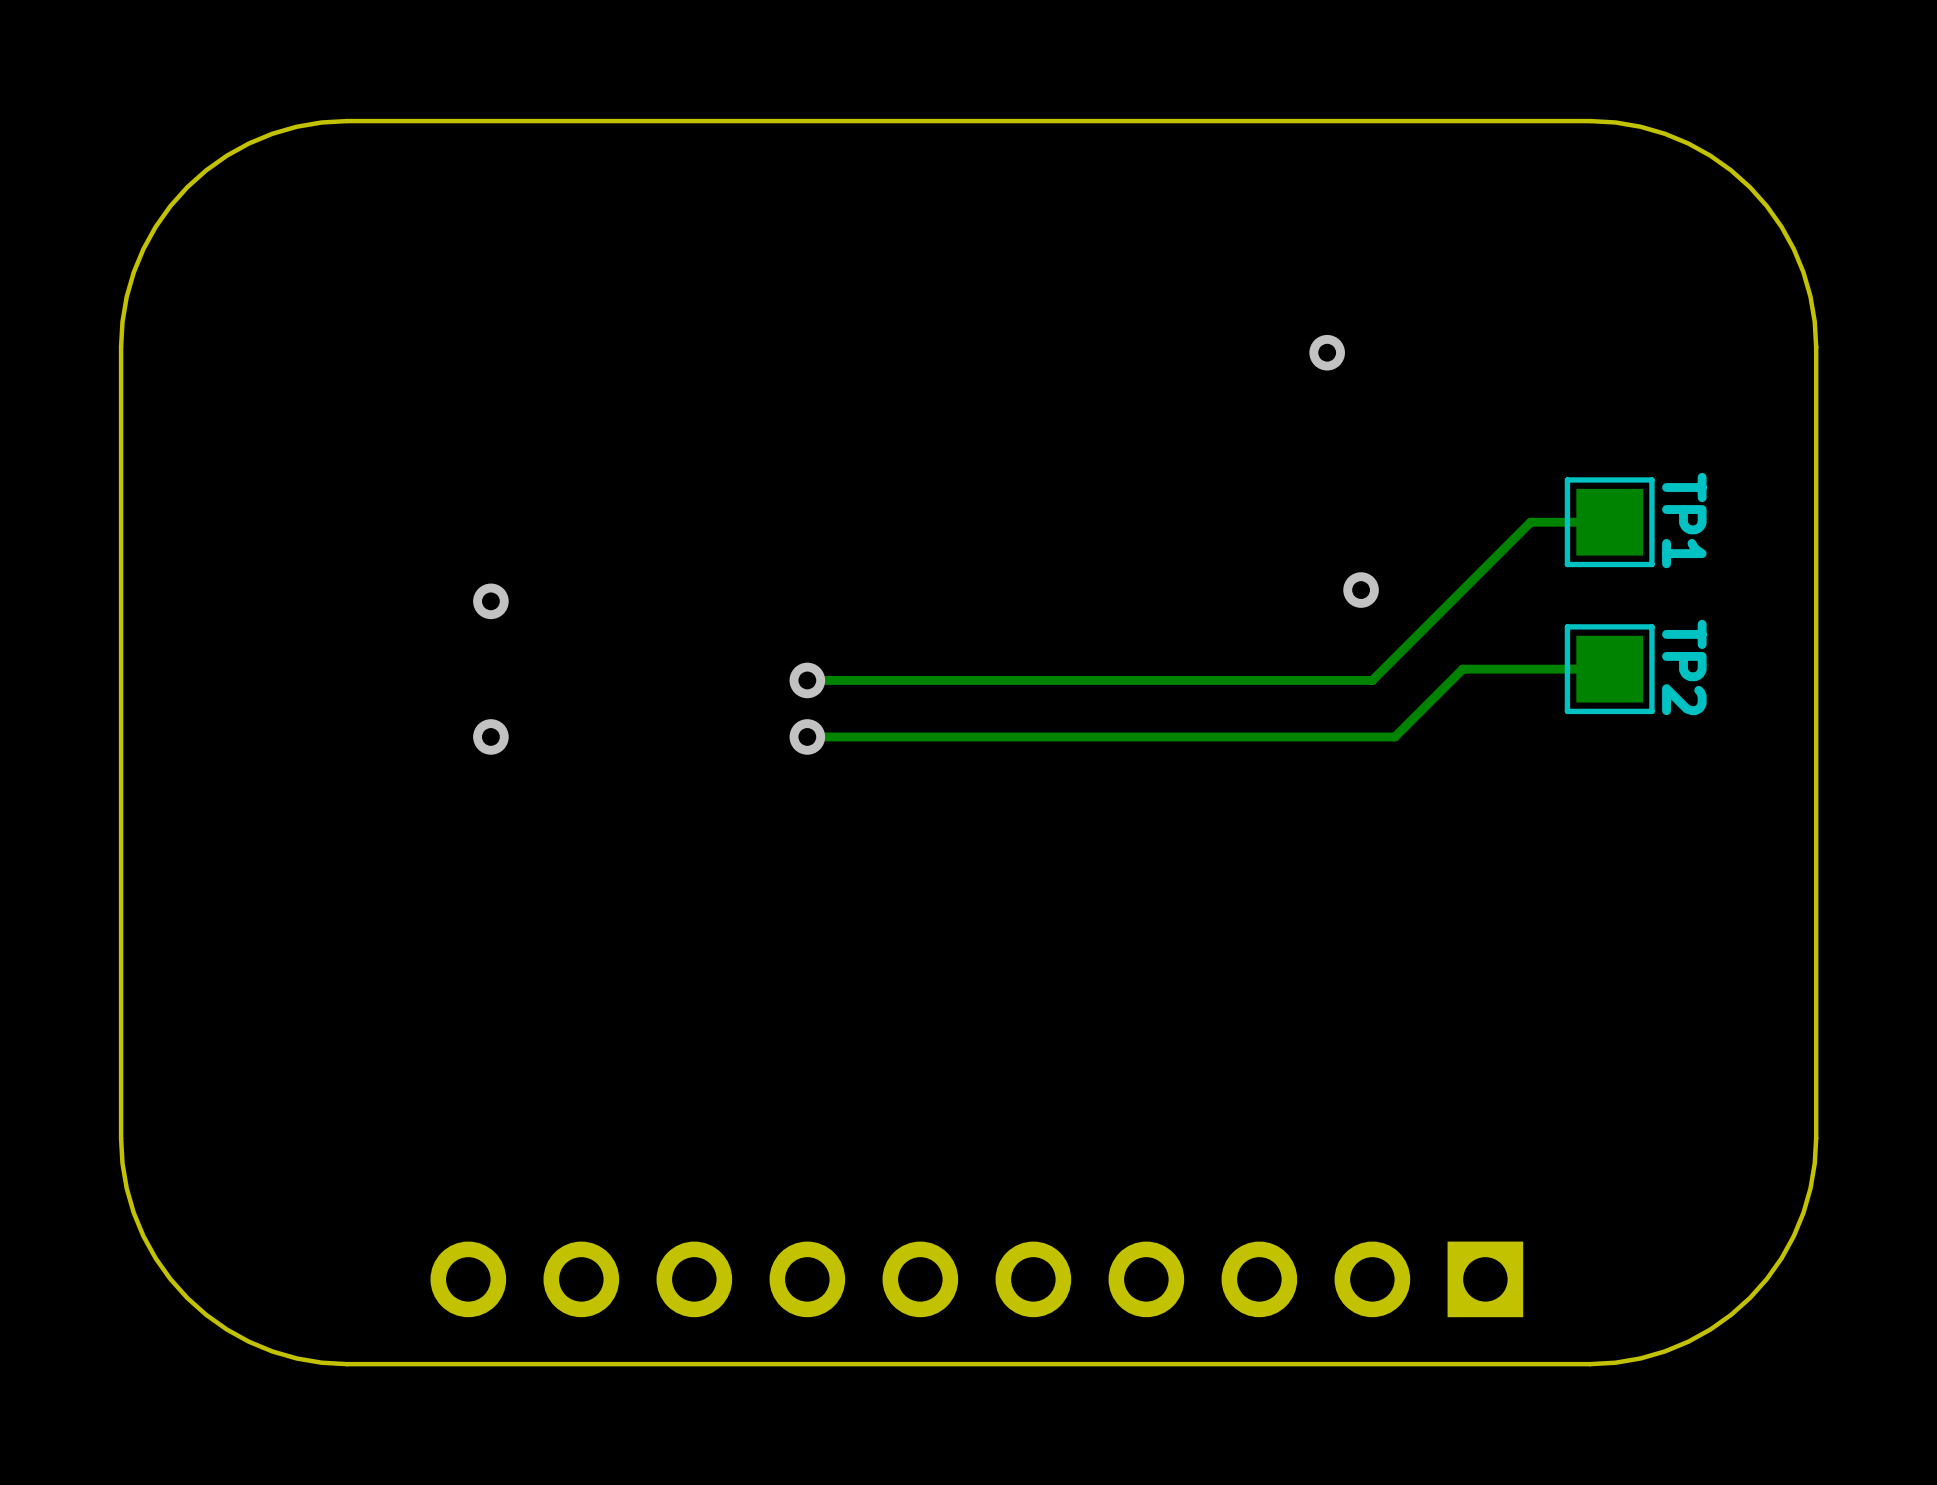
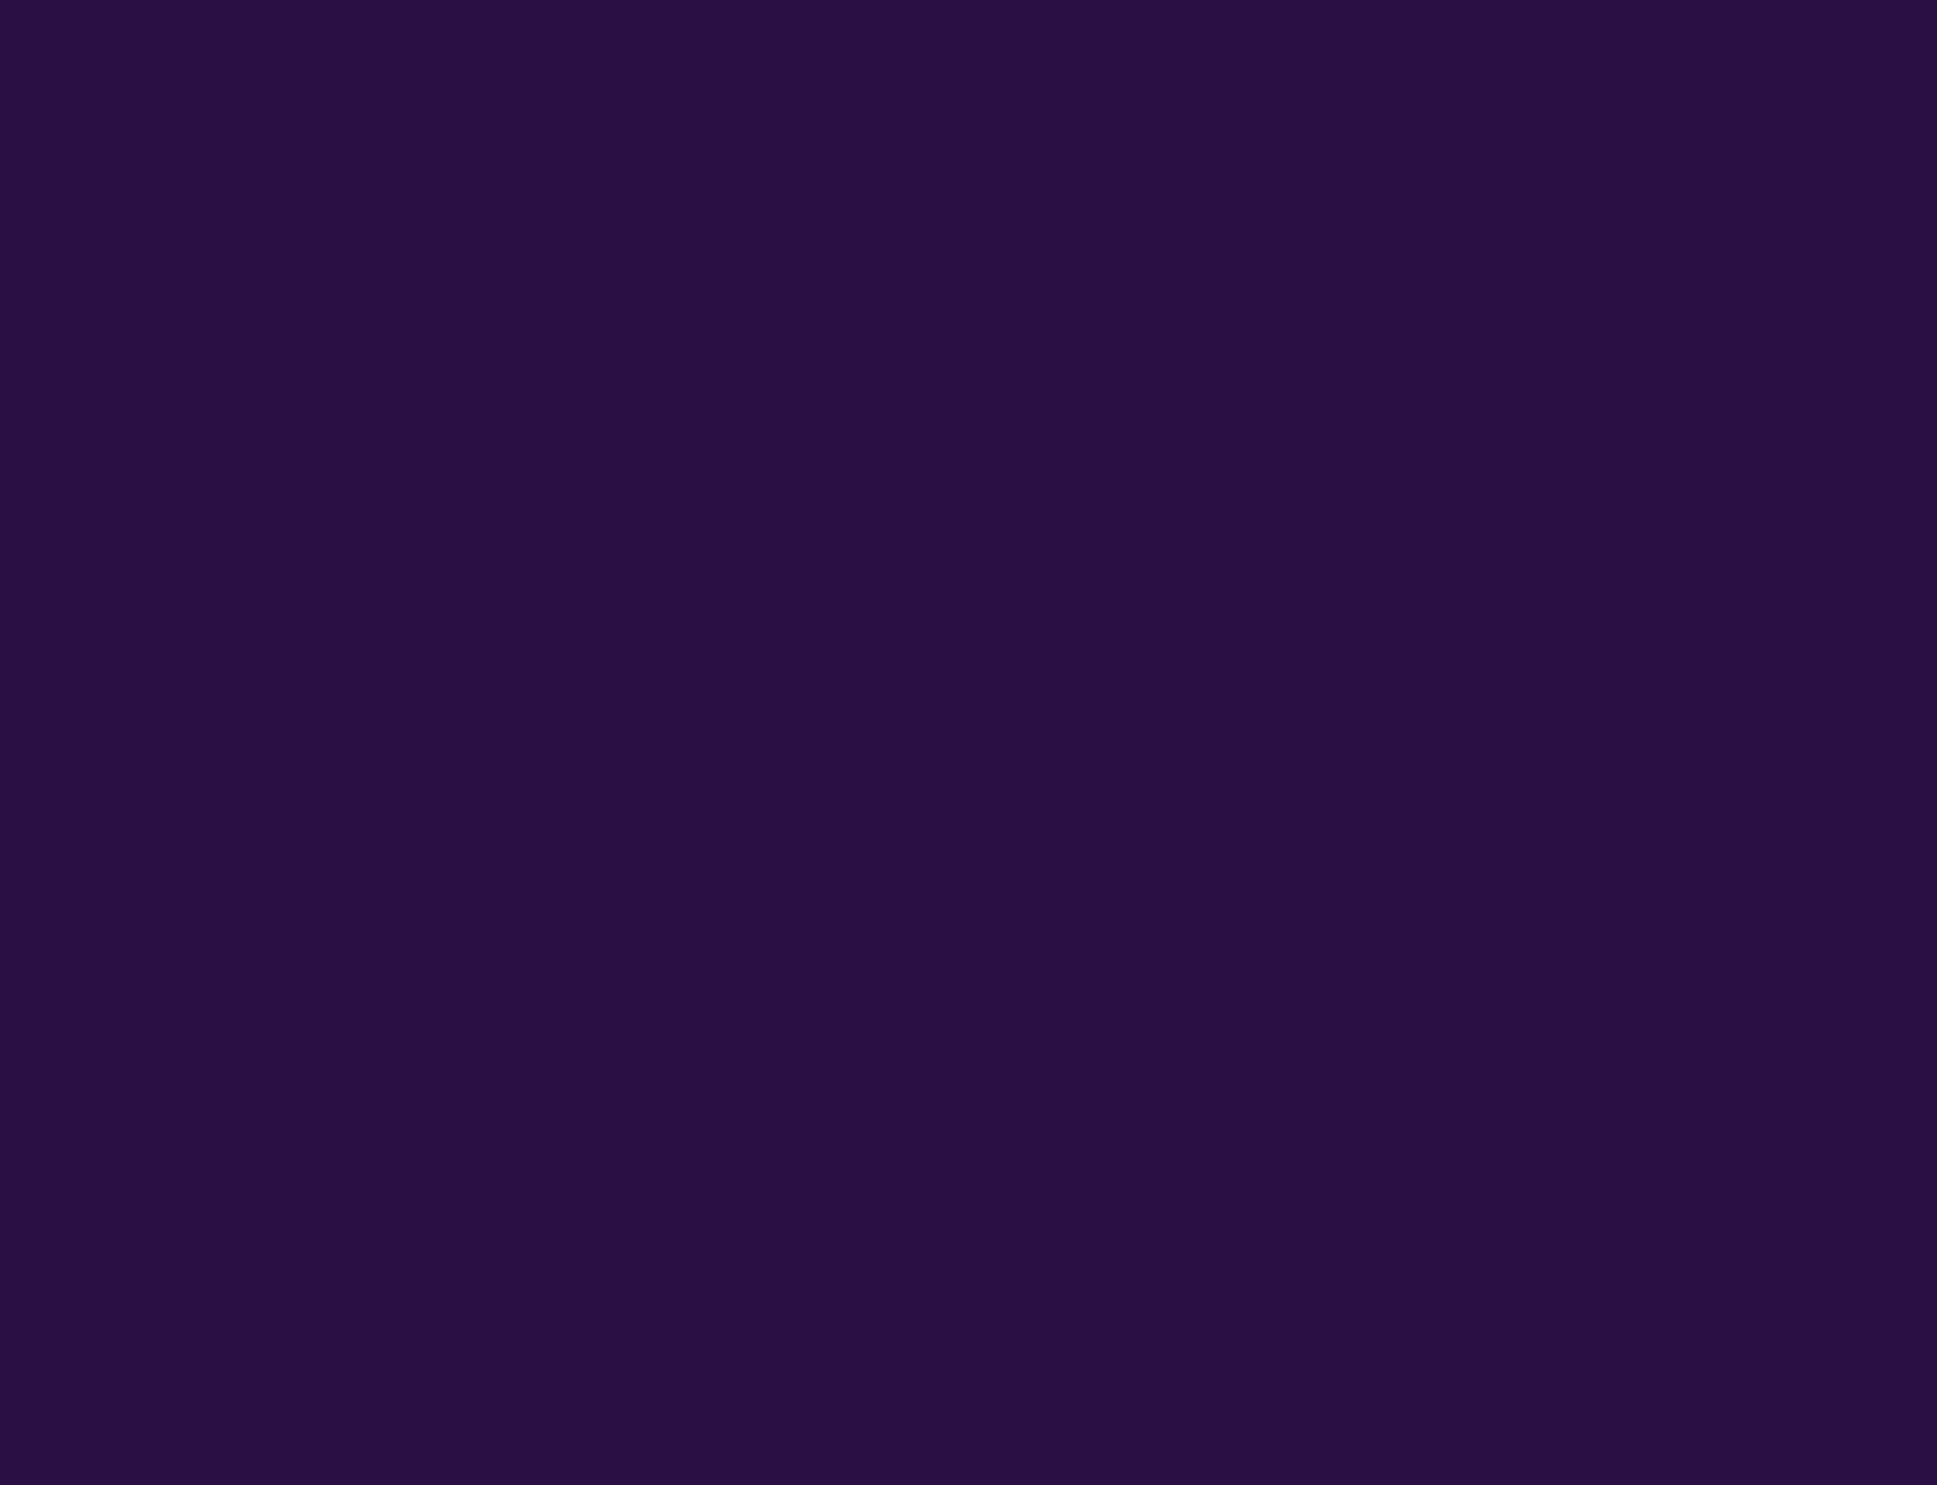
board edge: (1590, 121) (347, 121) (321, 122) (272, 133) (226, 155) (206, 170) (170, 206) (143, 249) (126, 296) (121, 347) (121, 1138) (122, 1163) (133, 1212) (155, 1258) (170, 1279) (206, 1314) (249, 1341) (296, 1358) (347, 1364) (1590, 1364) (1615, 1362) (1664, 1351) (1688, 1341) (1731, 1314) (1766, 1279) (1793, 1236) (1810, 1188) (1814, 1163) (1814, 321) (1810, 296) (1793, 249) (1766, 206) (1731, 170) (1710, 155) (1664, 133) (1615, 122) (1590, 121) -> none
via: (1327, 352) -> none
track: (1609, 522) (1530, 522) (1372, 680) (807, 680) -> none
TP1: (1609, 522) -> none
via: (1361, 590) -> none
via: (490, 601) -> none
track: (1609, 669) (1462, 669) (1394, 736) (807, 736) -> none
TP2: (1609, 669) -> none
via: (807, 680) -> none
via: (490, 736) -> none
via: (807, 736) -> none
part: (976, 1279) -> none

